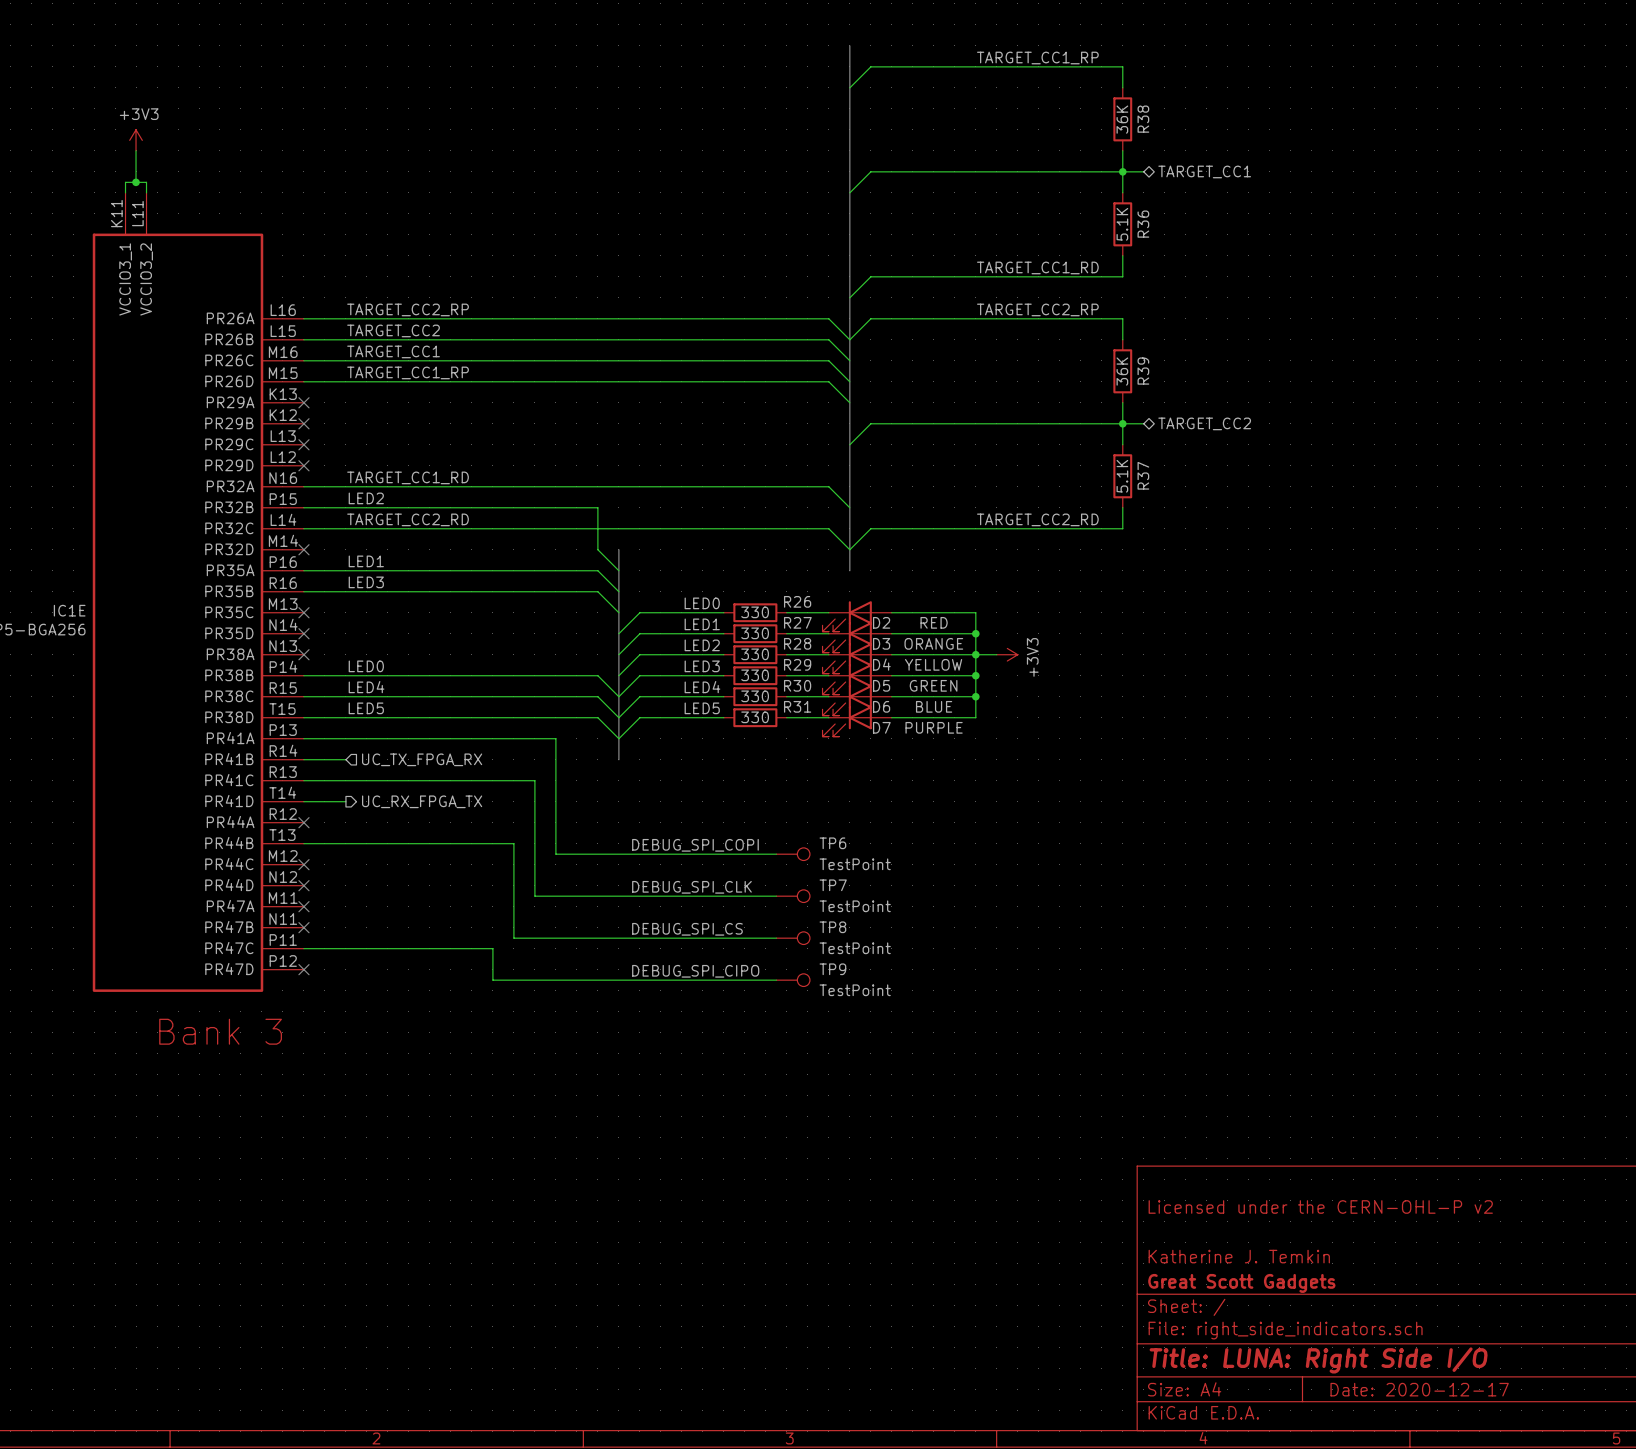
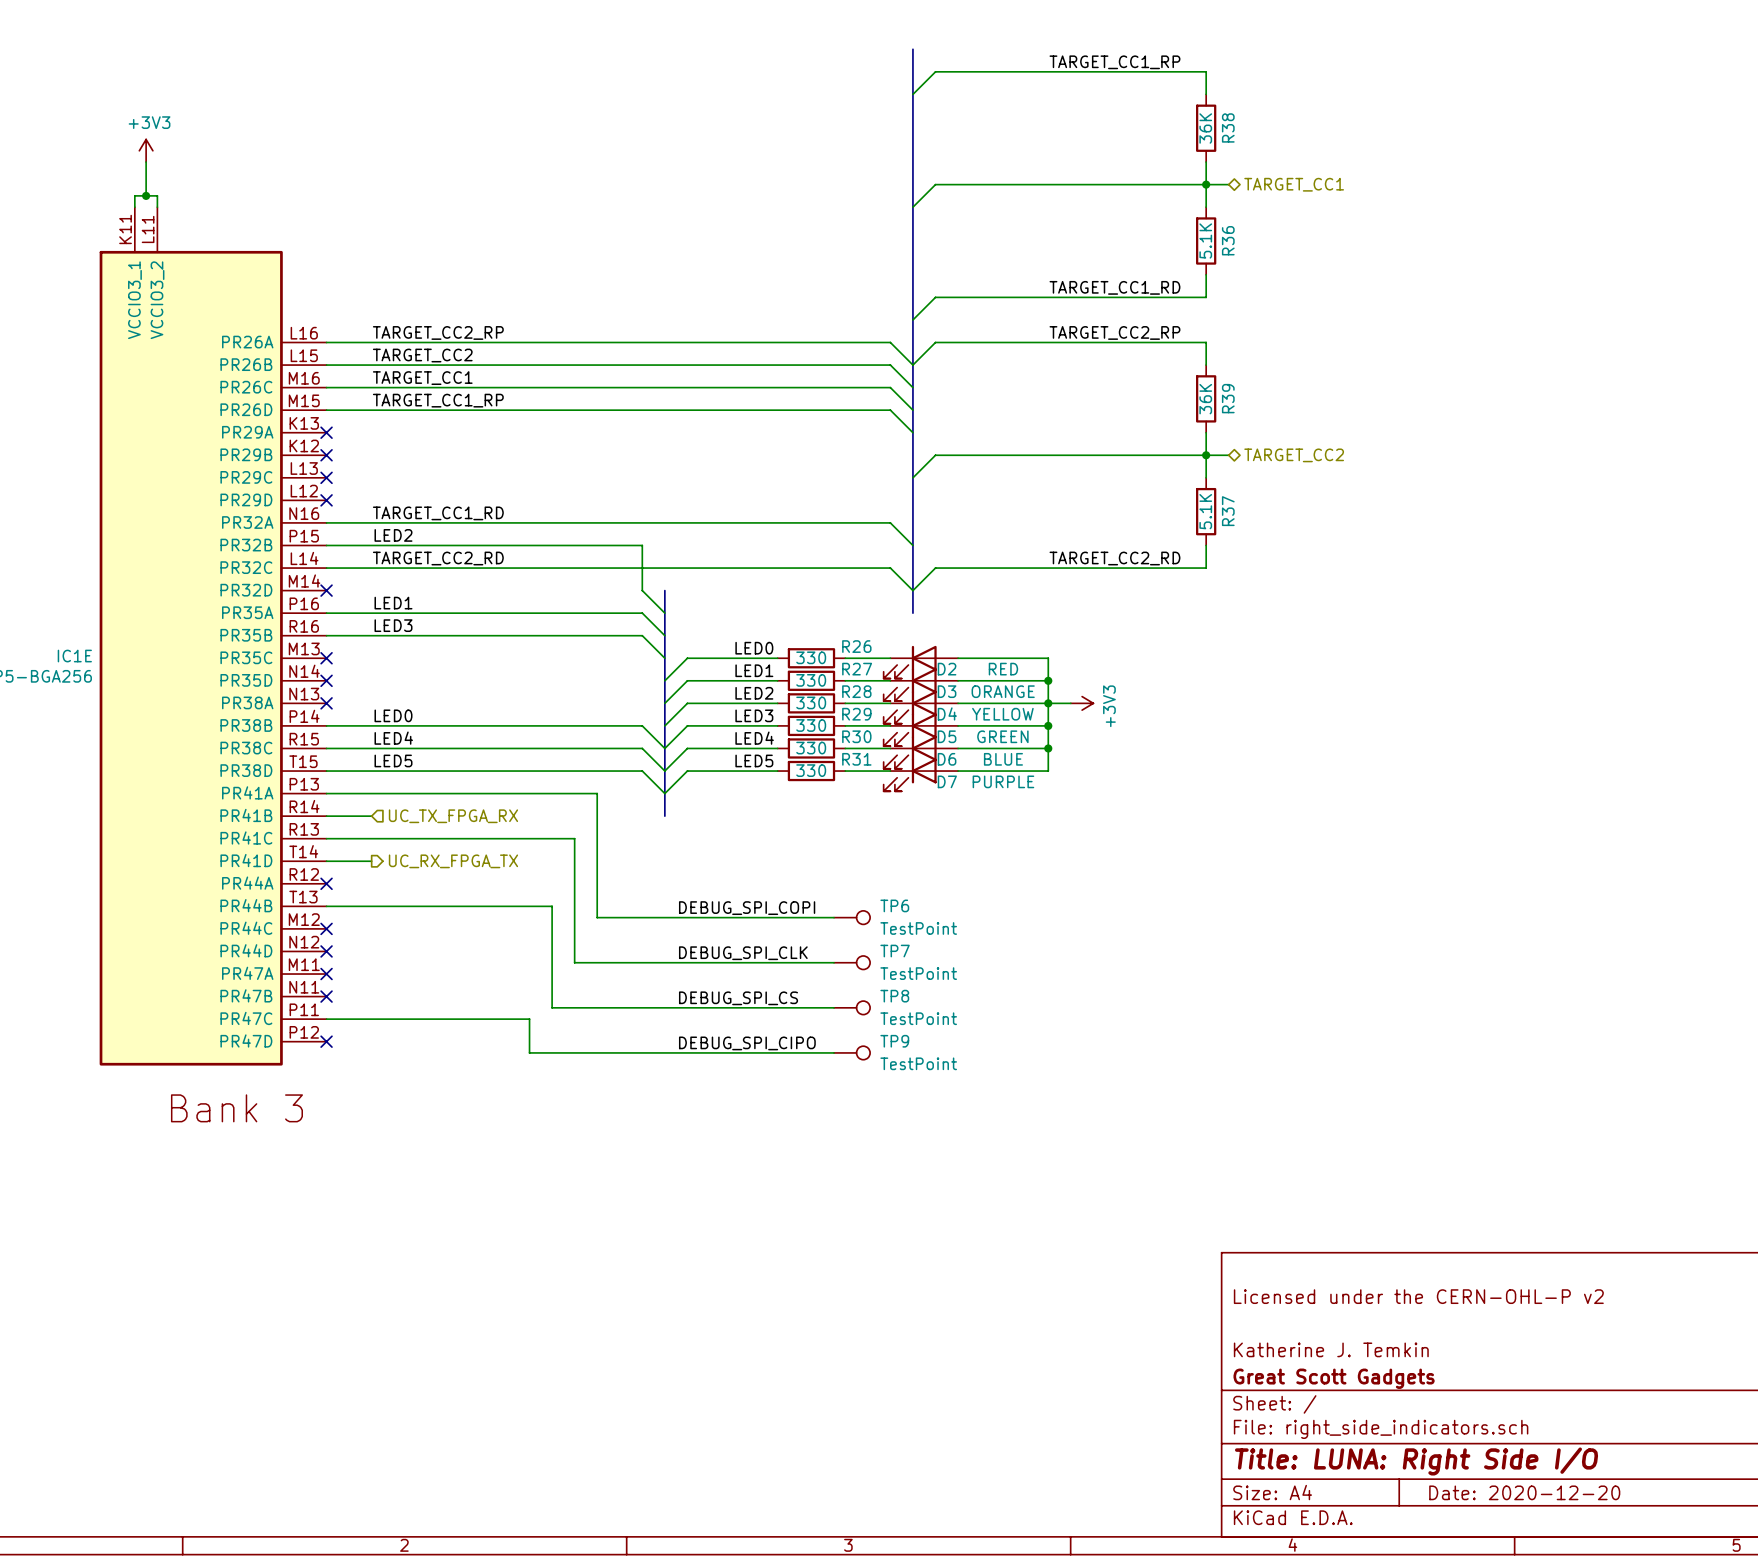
title block: Date: 2020-12-17 (1419, 1389) -> Date: 2020-12-20 (1524, 1492)

